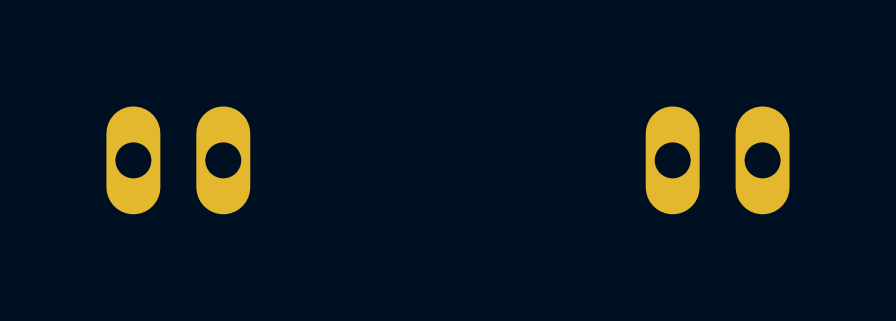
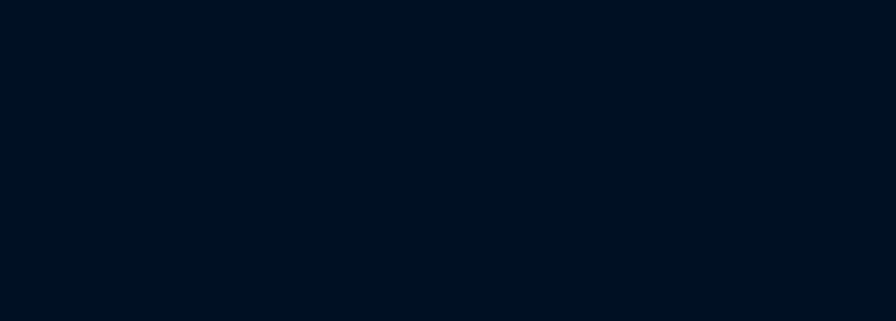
part: (178, 160) -> none
part: (717, 160) -> none

